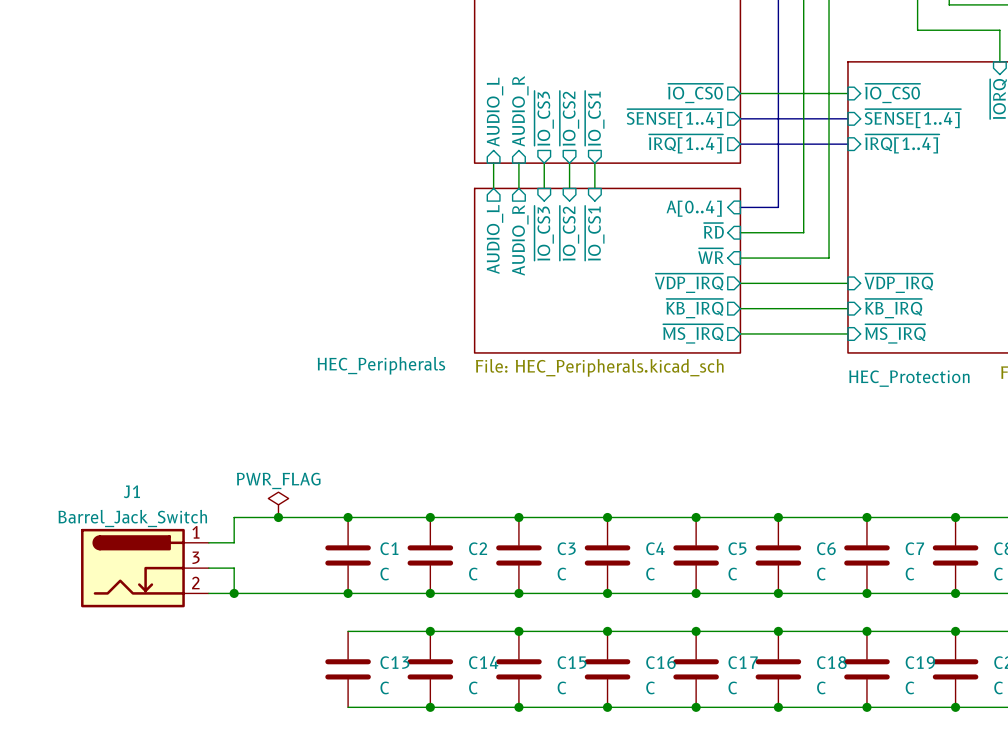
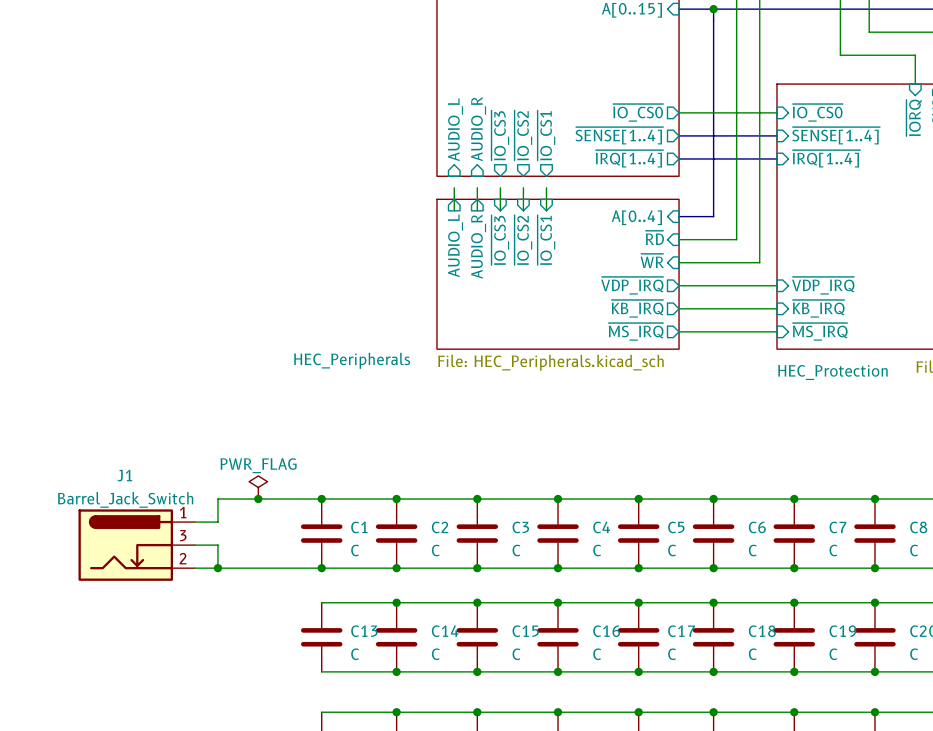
wire: (493, 163) (493, 175) -> (454, 199) (454, 210)
wire: (518, 163) (518, 175) -> (477, 199) (477, 210)
wire: (544, 163) (544, 175) -> (500, 199) (500, 210)
wire: (569, 163) (569, 175) -> (523, 199) (523, 210)
wire: (594, 163) (594, 175) -> (546, 199) (546, 210)

